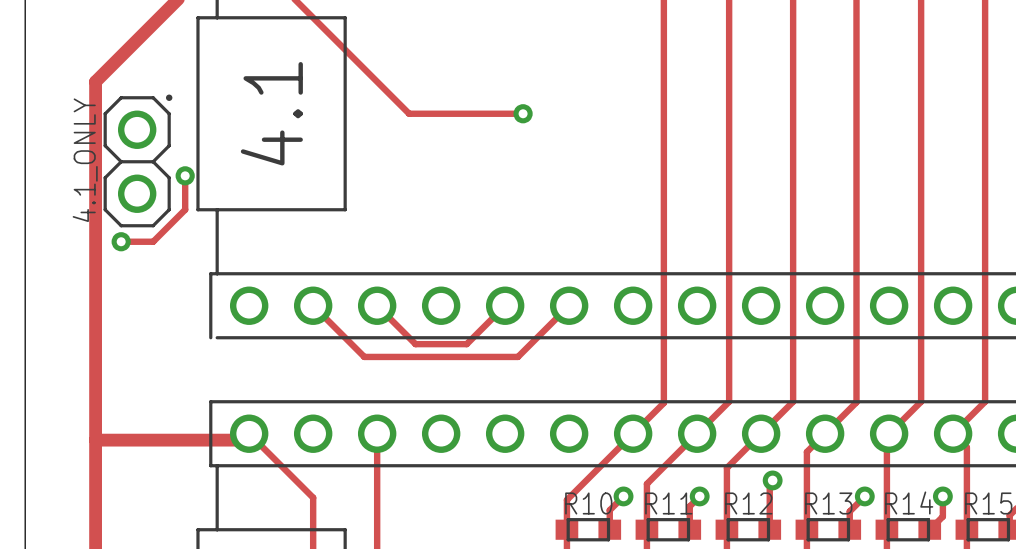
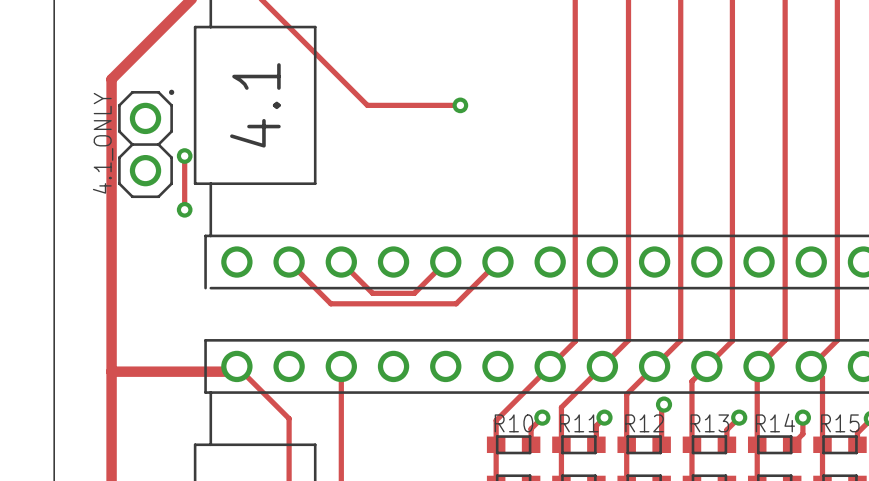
track: (185, 209) (153, 241) (121, 241) -> (184, 183) (184, 209)
via position: (121, 241) -> (184, 209)

